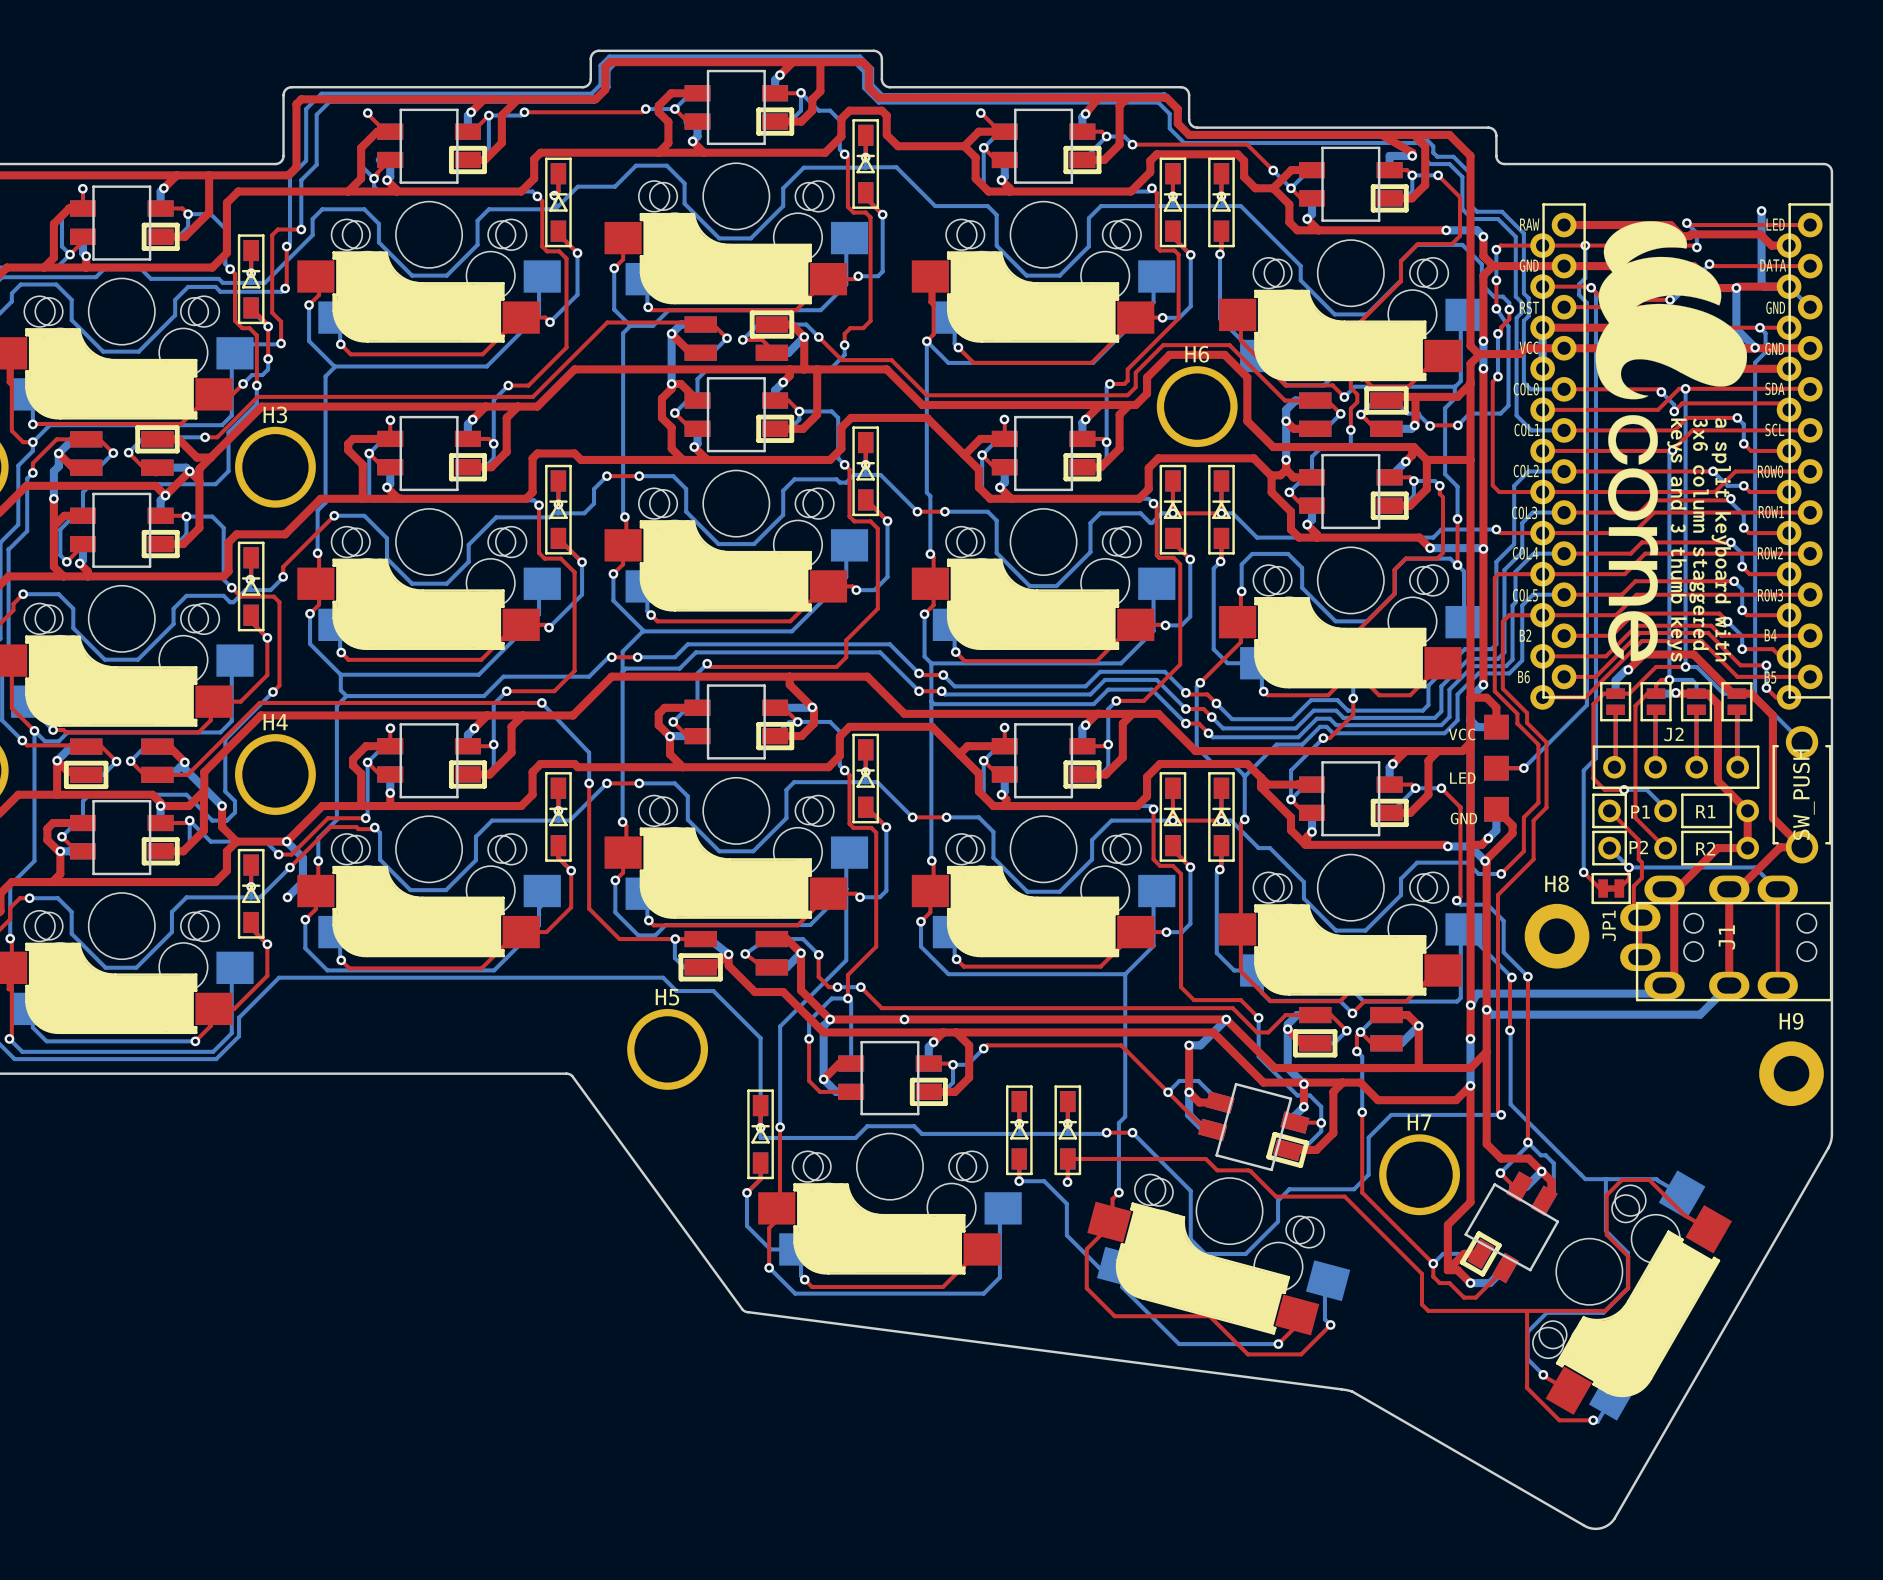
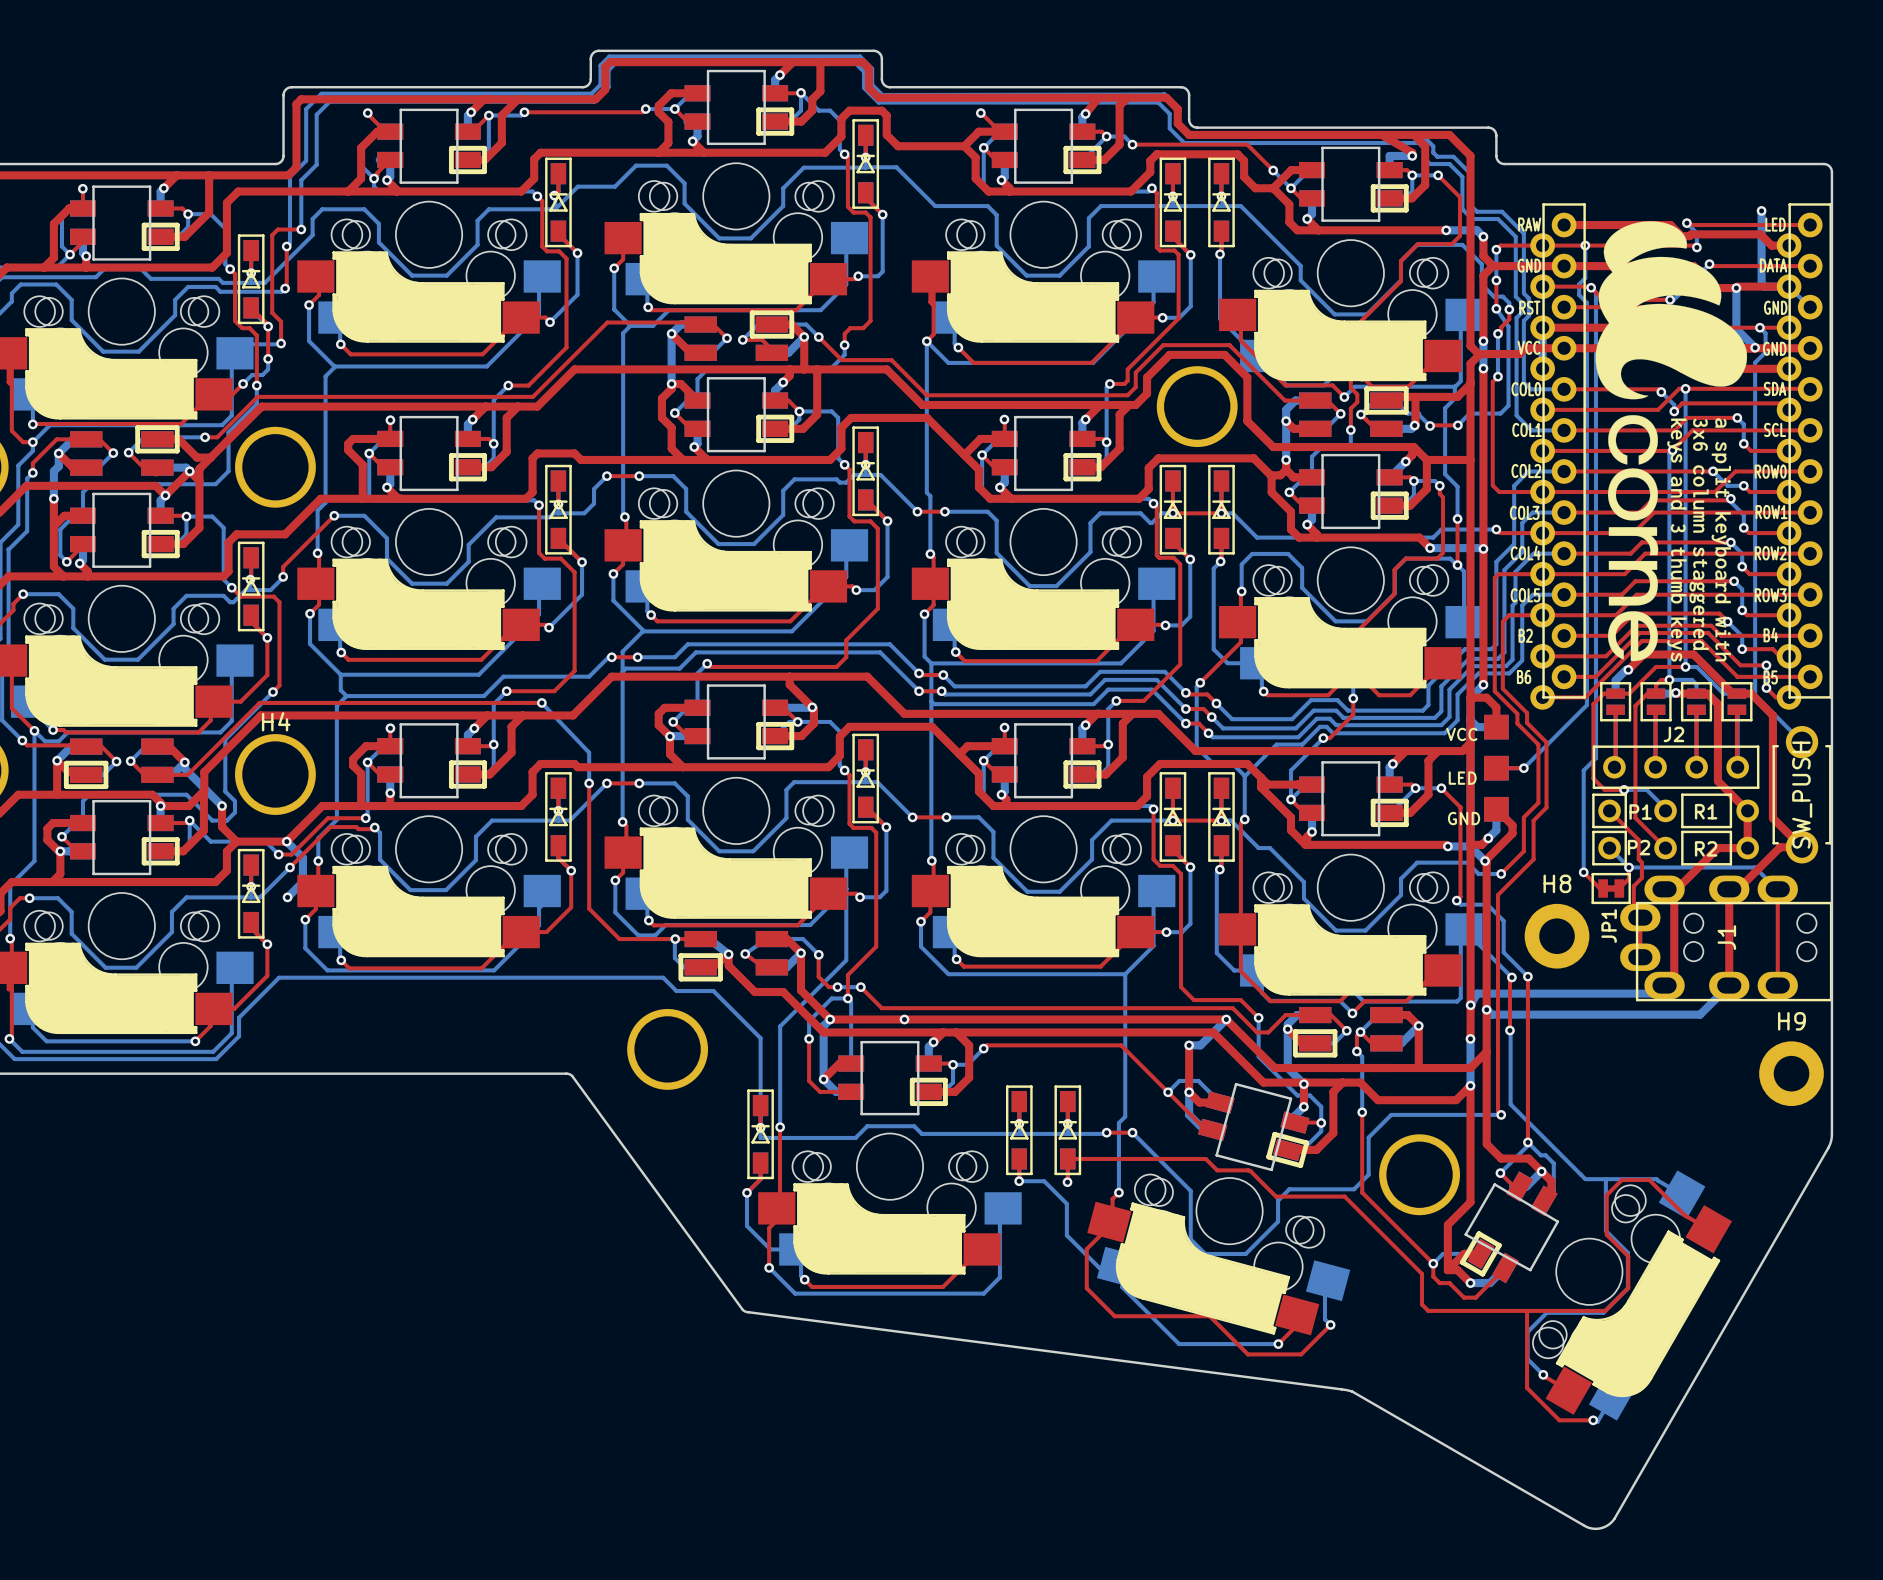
H6 name: H6 (1197, 354) -> none
H3 name: H3 (275, 414) -> none
H5 name: H5 (667, 997) -> none
H7 name: H7 (1419, 1122) -> none

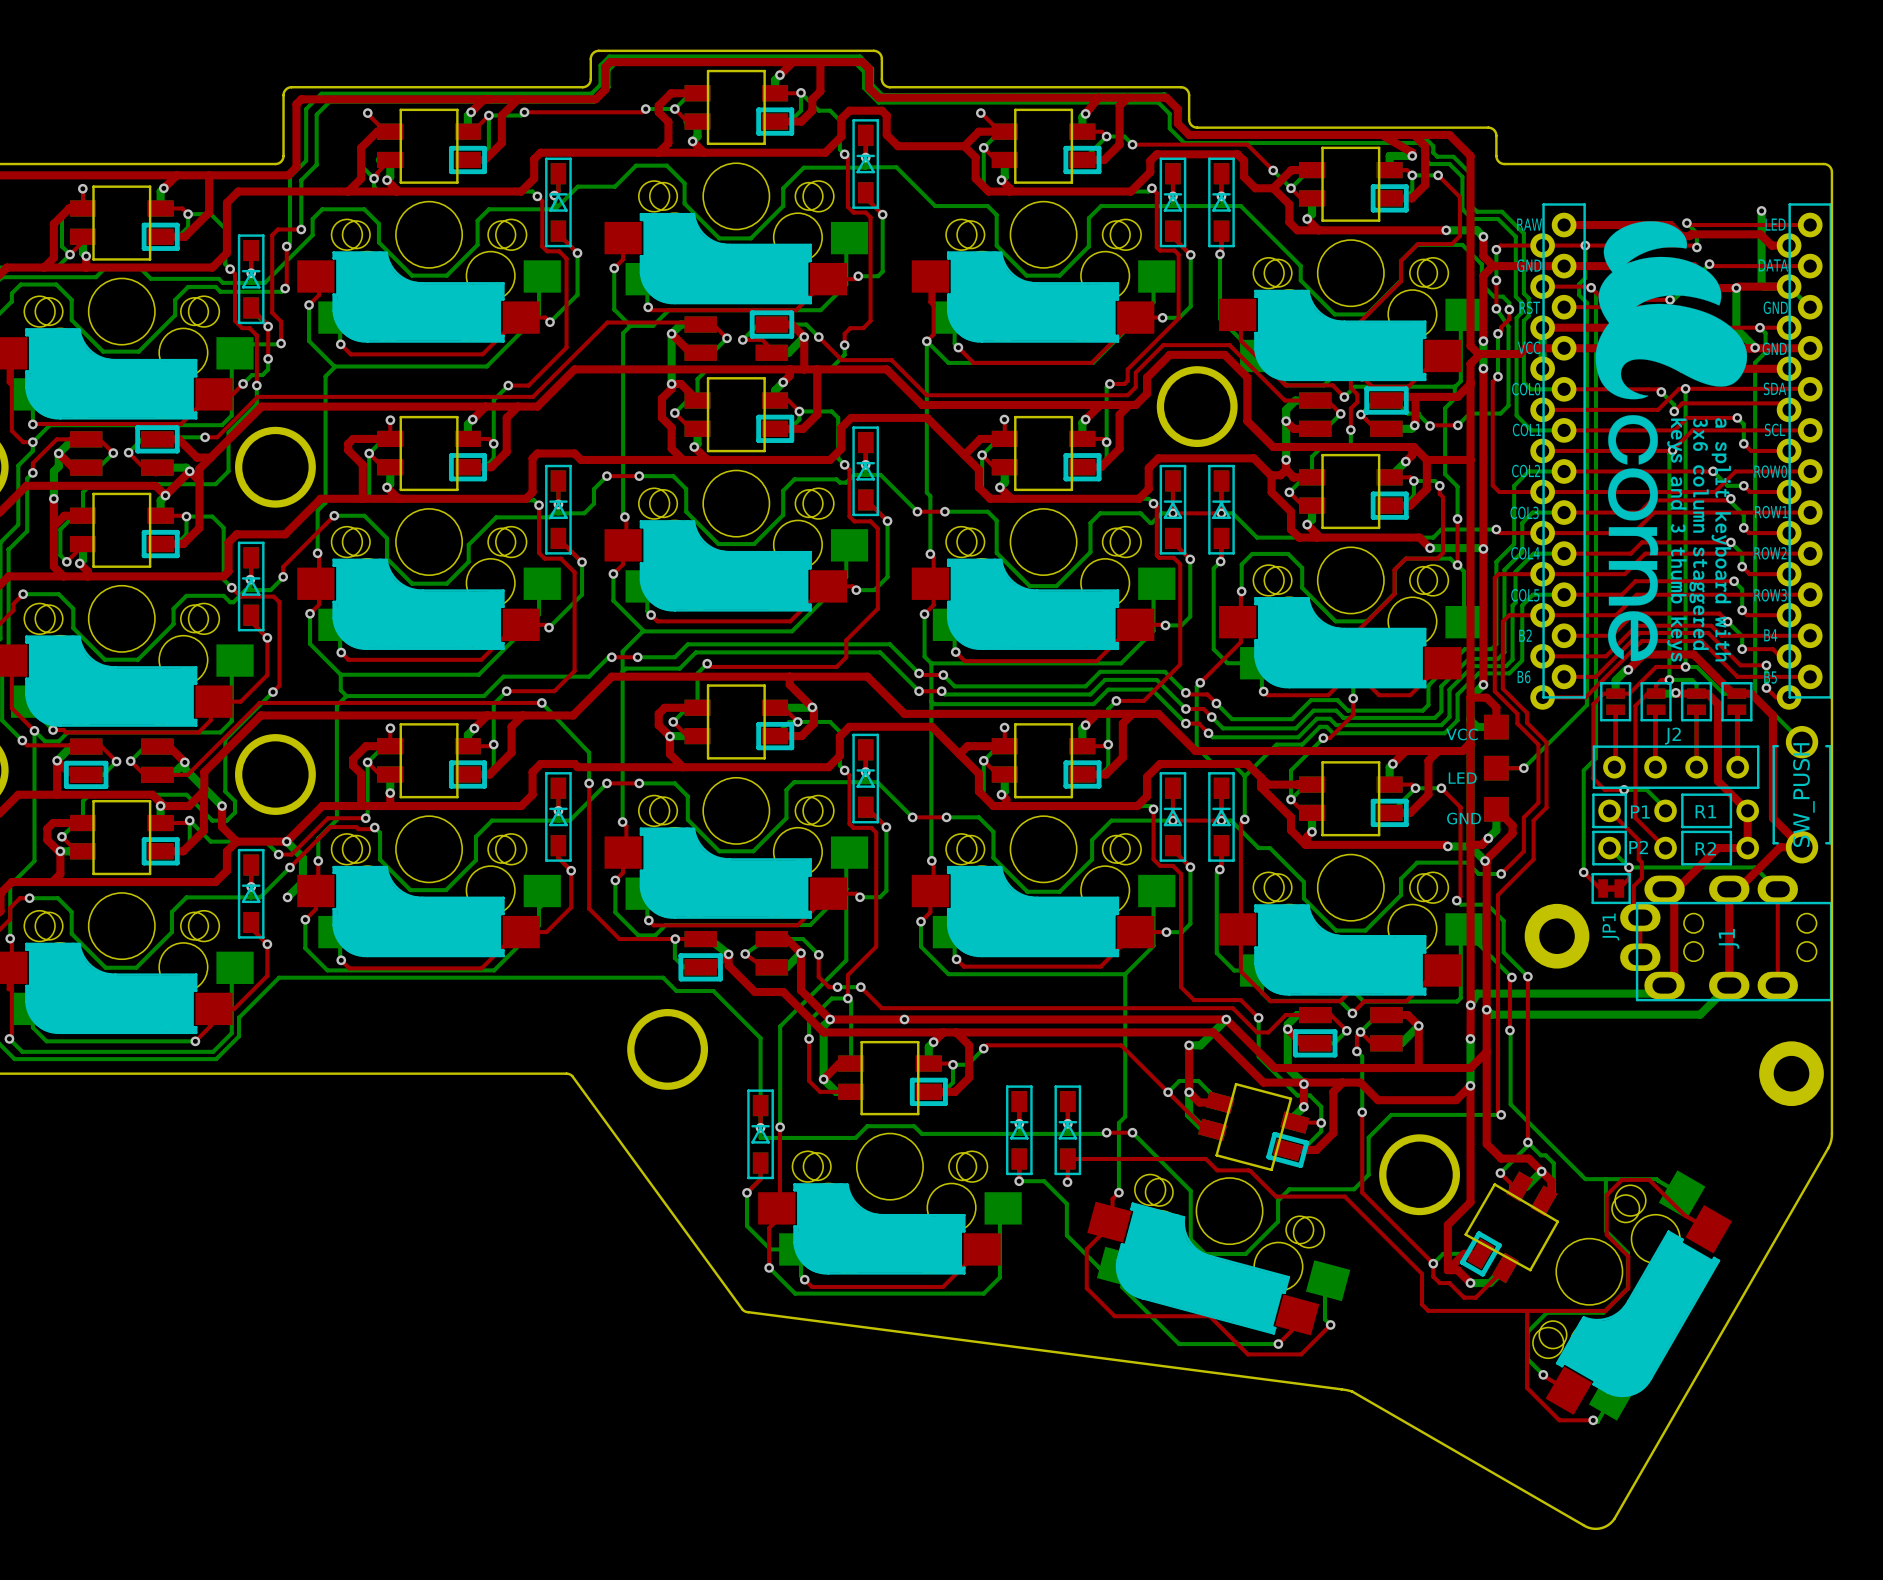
H4 name: H4 (276, 721) -> none
H8 name: H8 (1557, 883) -> none
H9 name: H9 (1791, 1021) -> none

